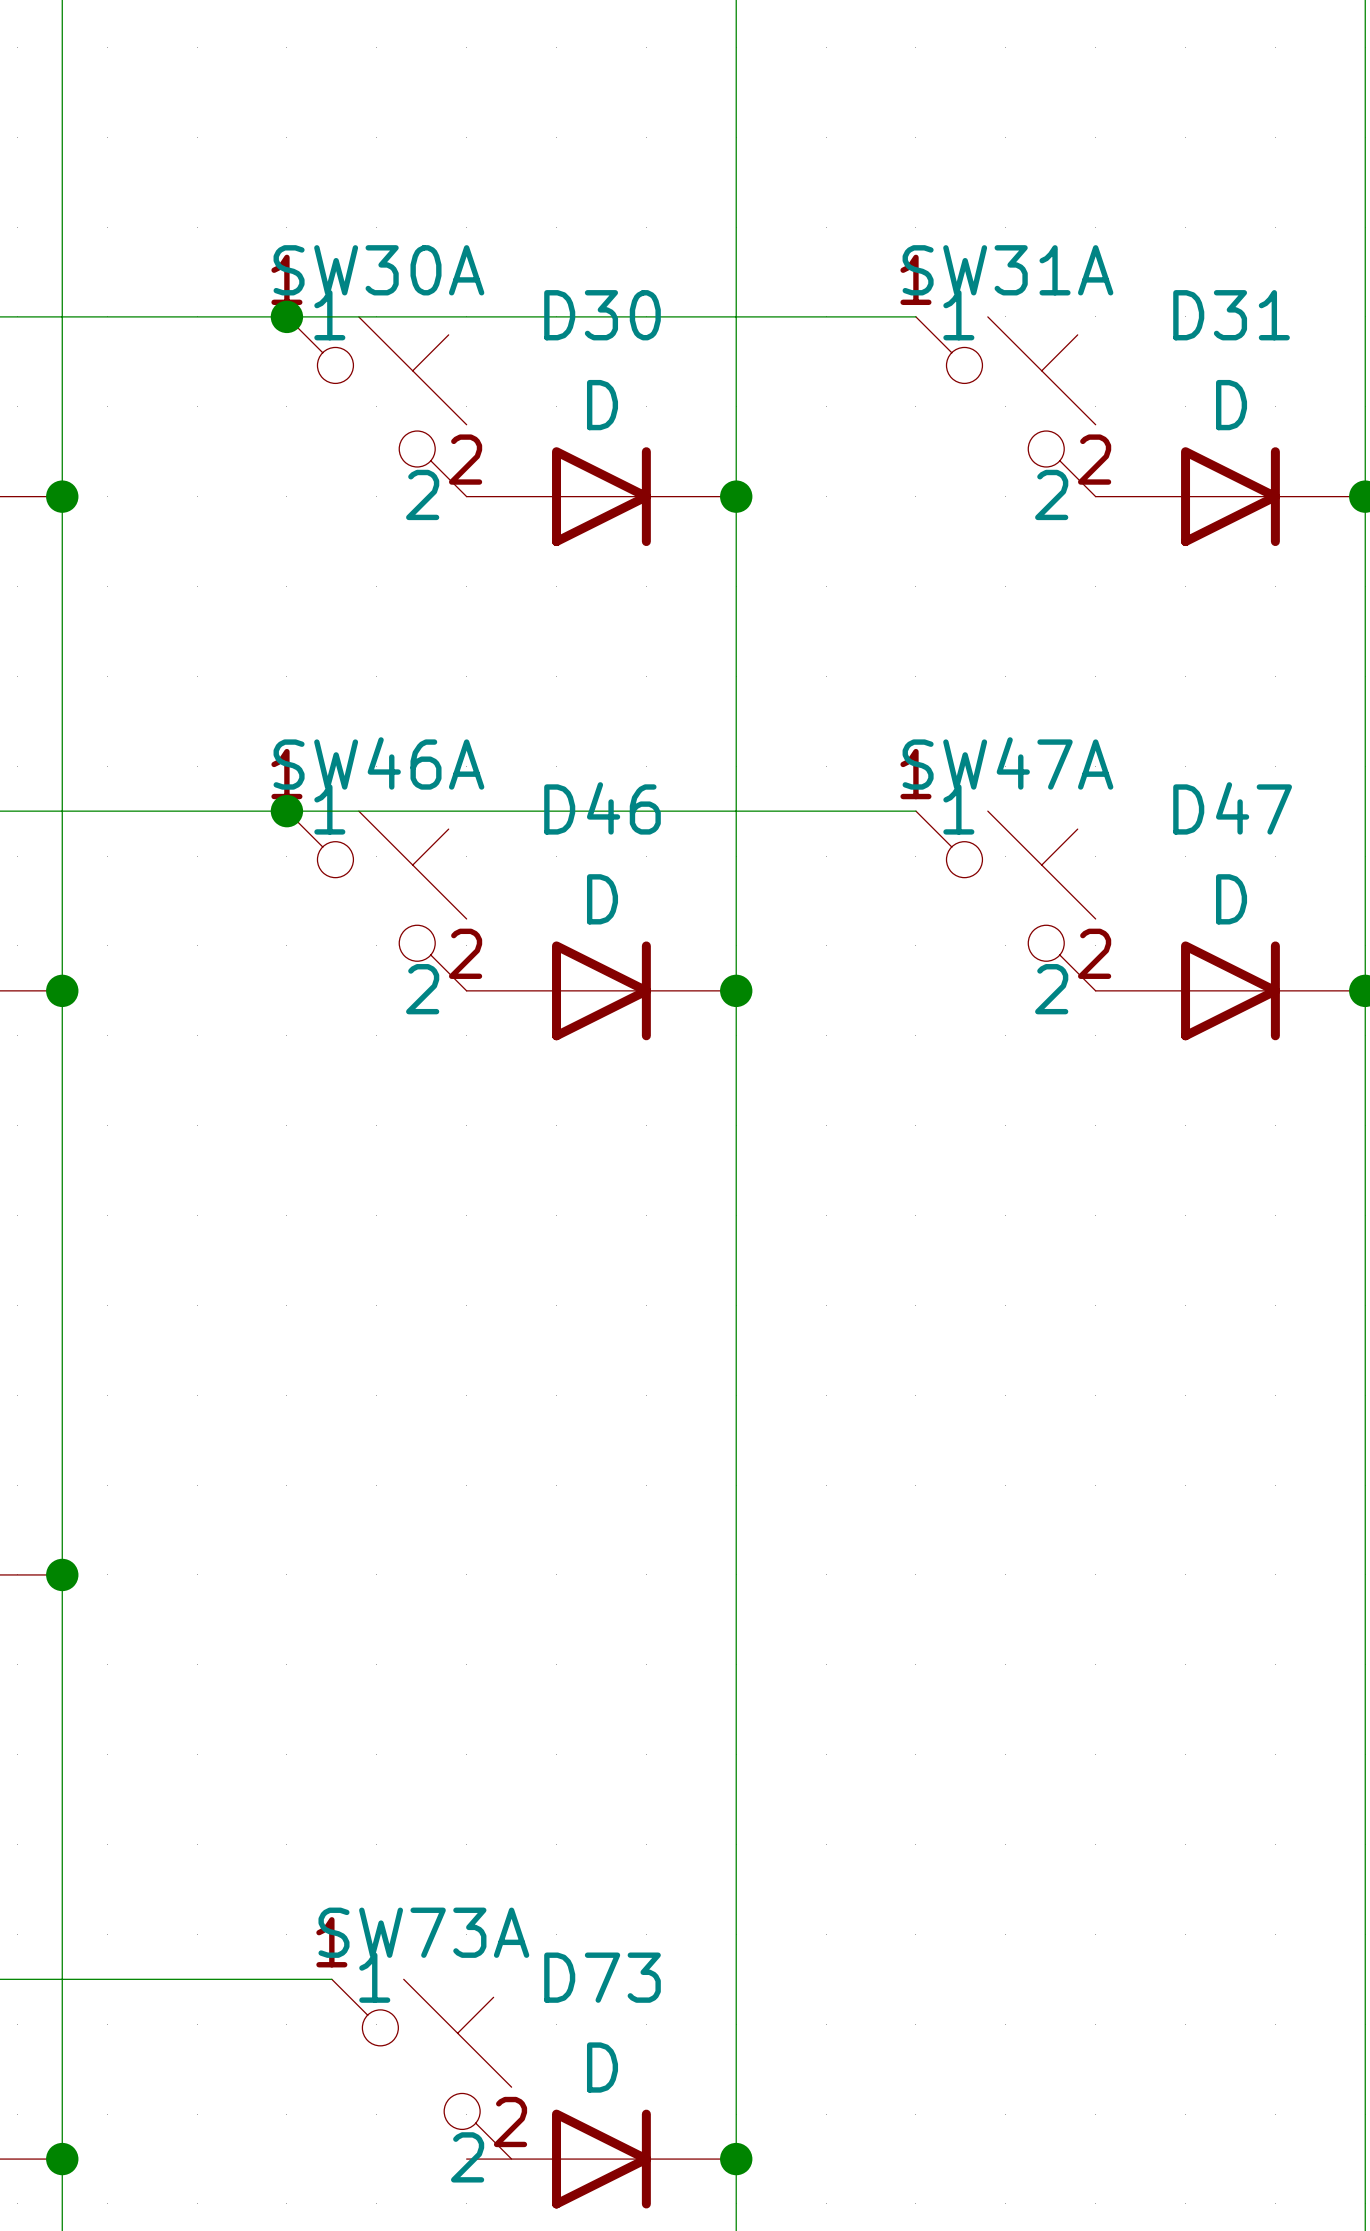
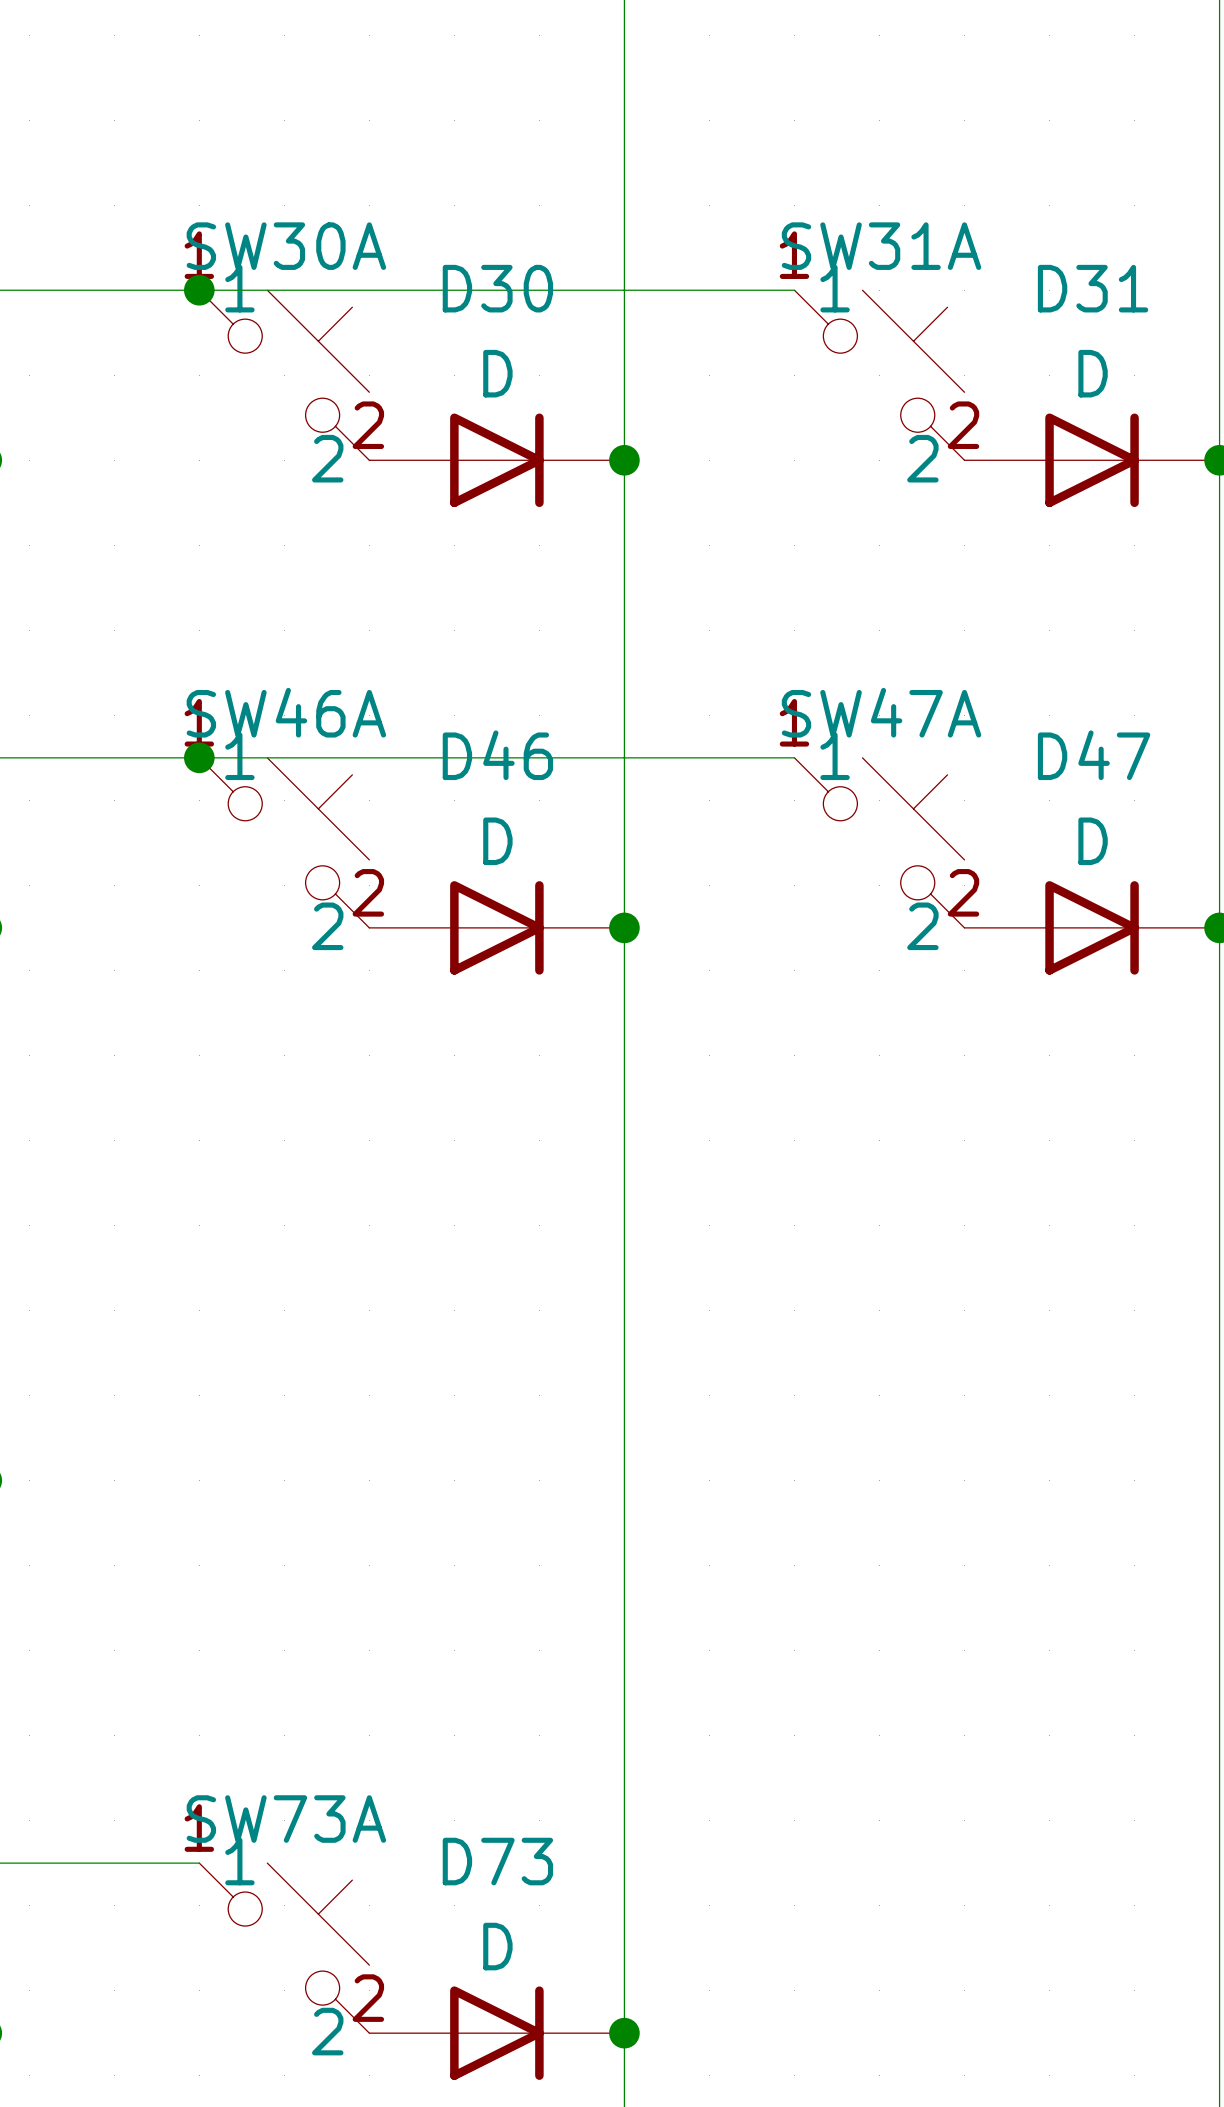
wire: (286, 1979) (331, 1979) -> none
SW73A position: (421, 2069) -> (284, 1948)

